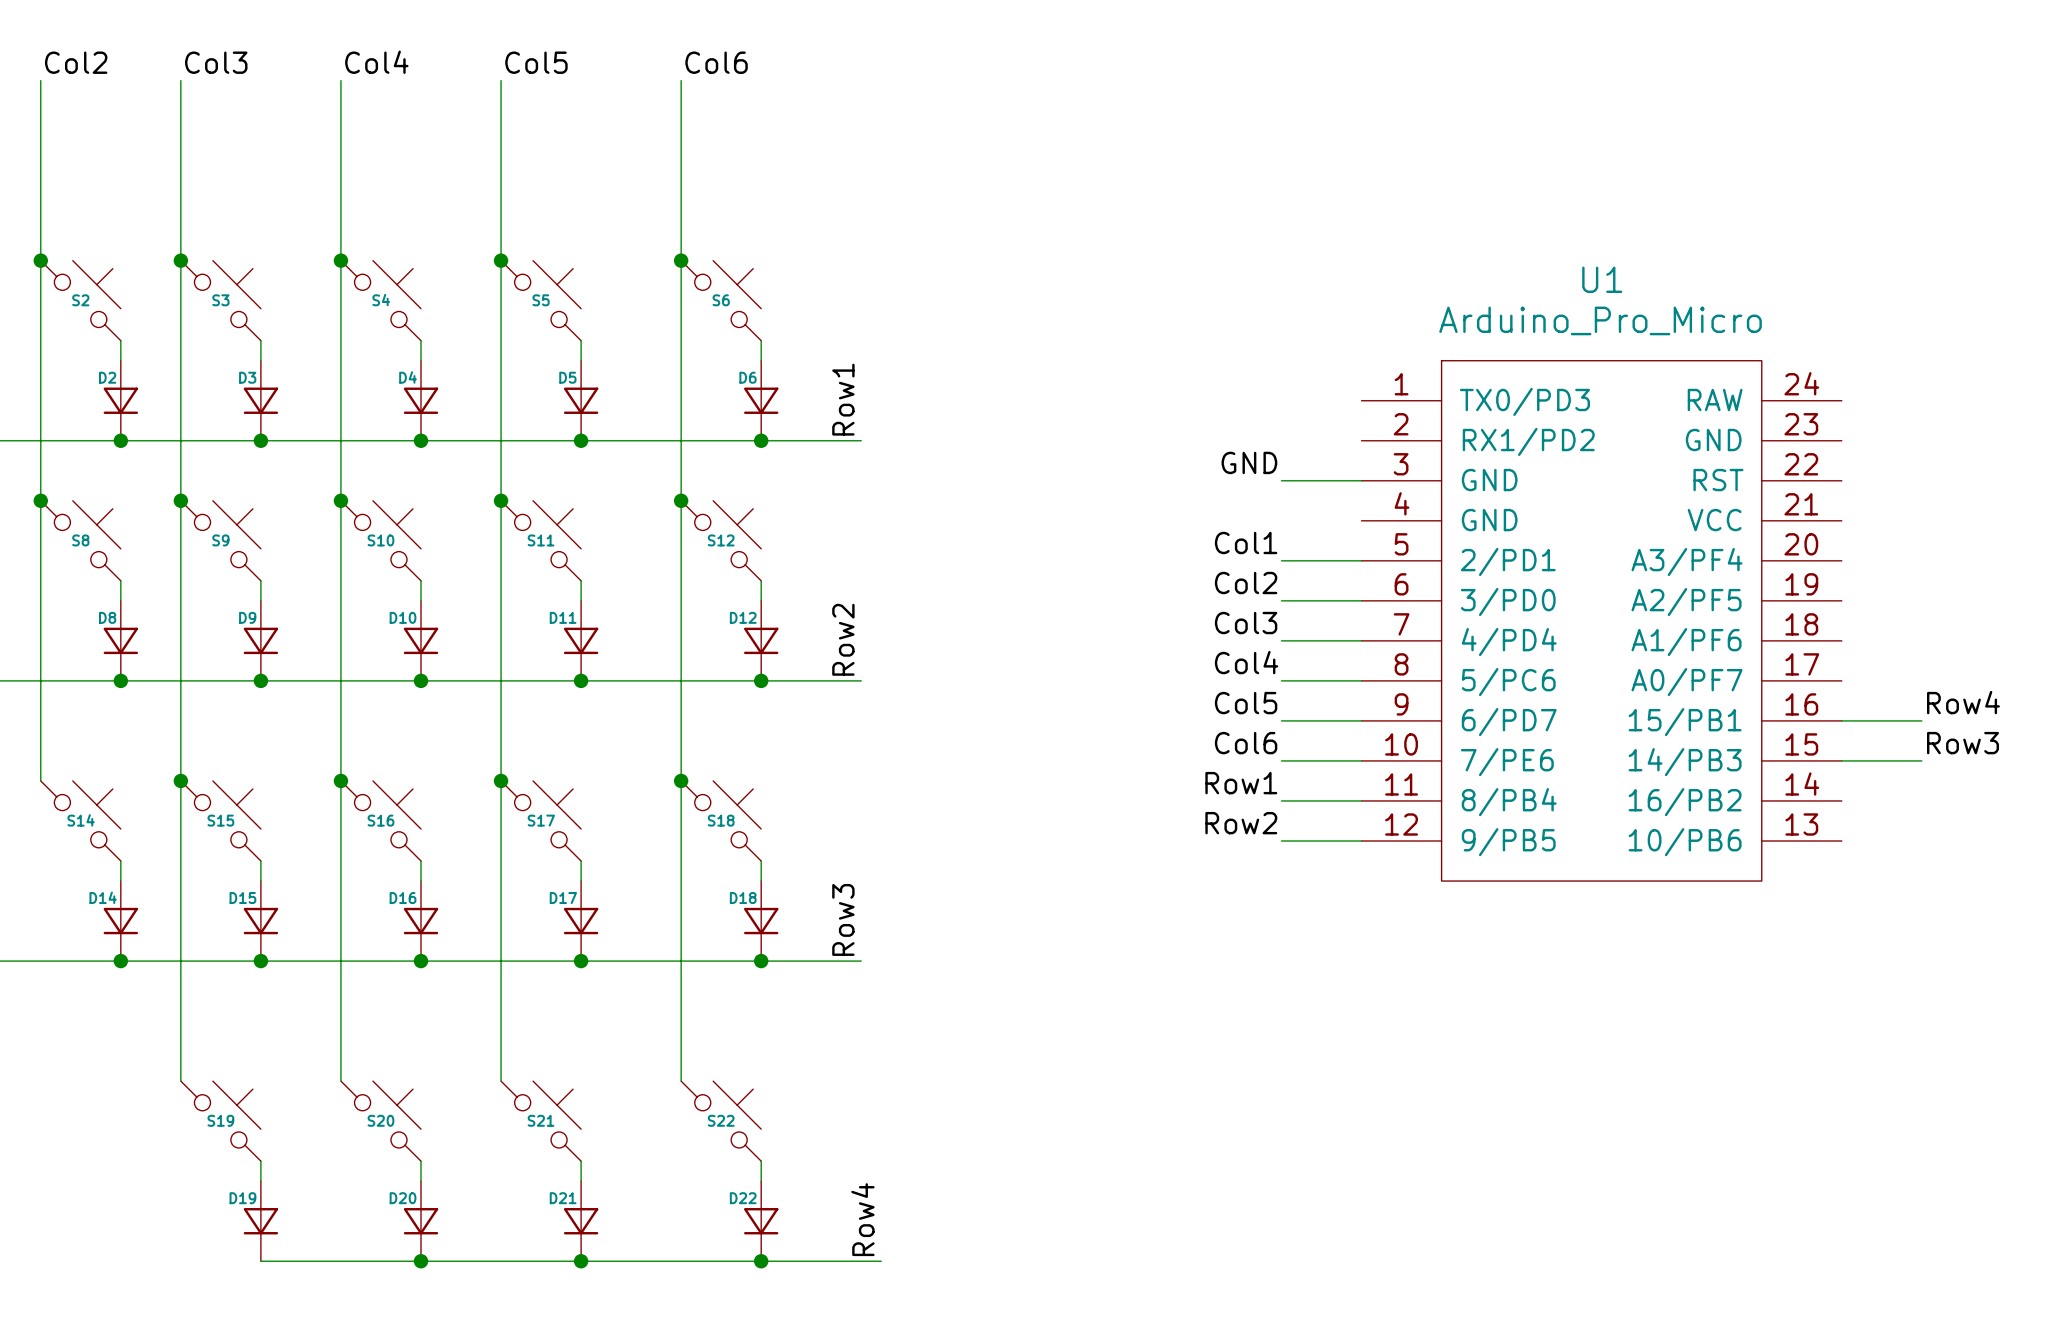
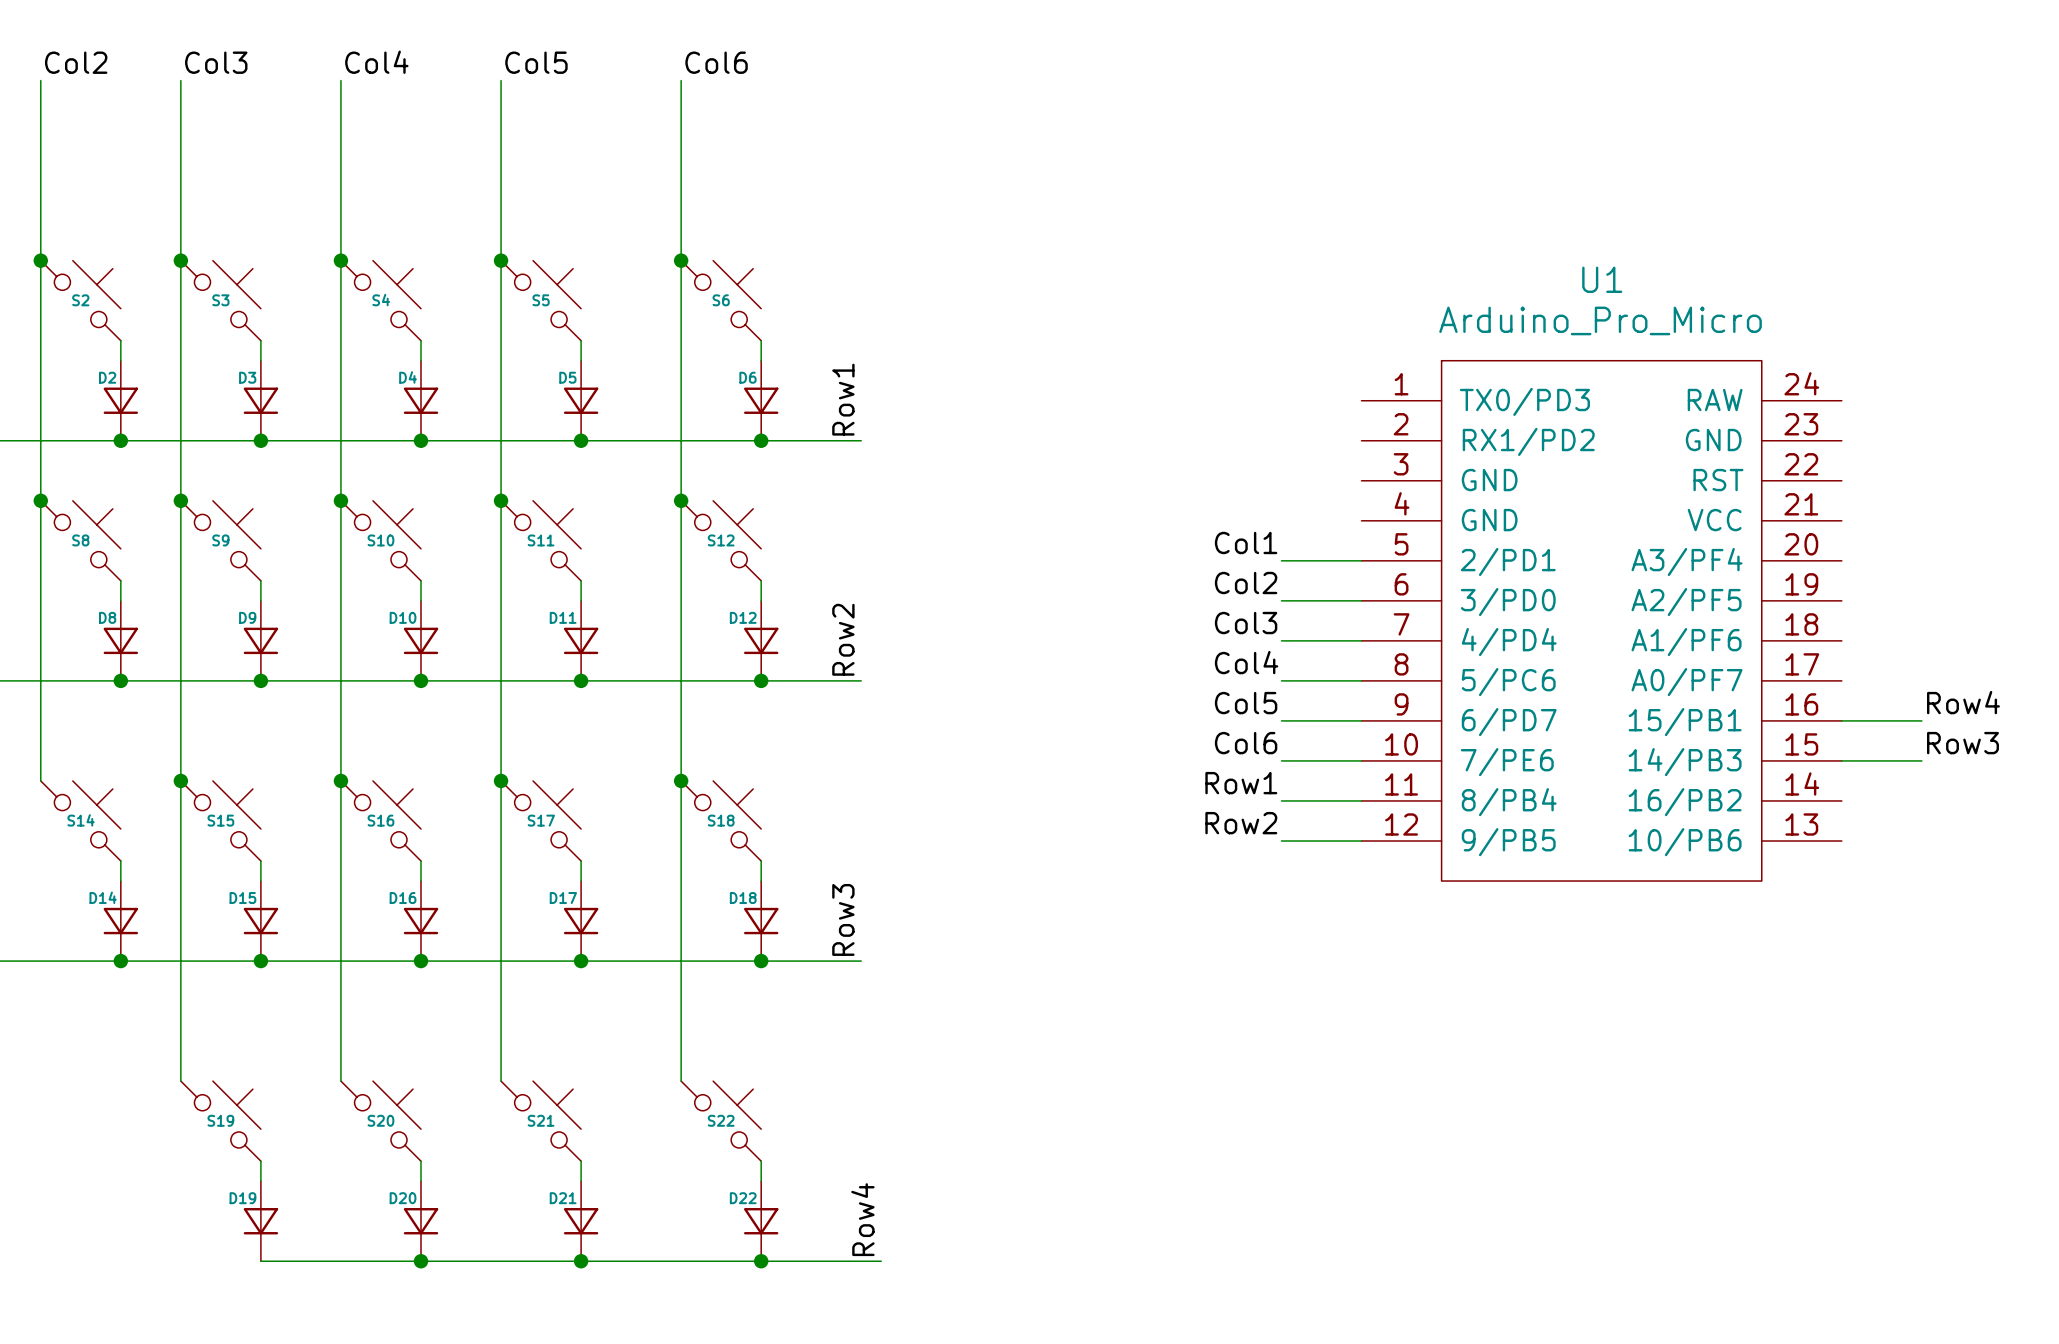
label: GND (1249, 462) -> none
wire: (1281, 480) (1361, 480) -> none

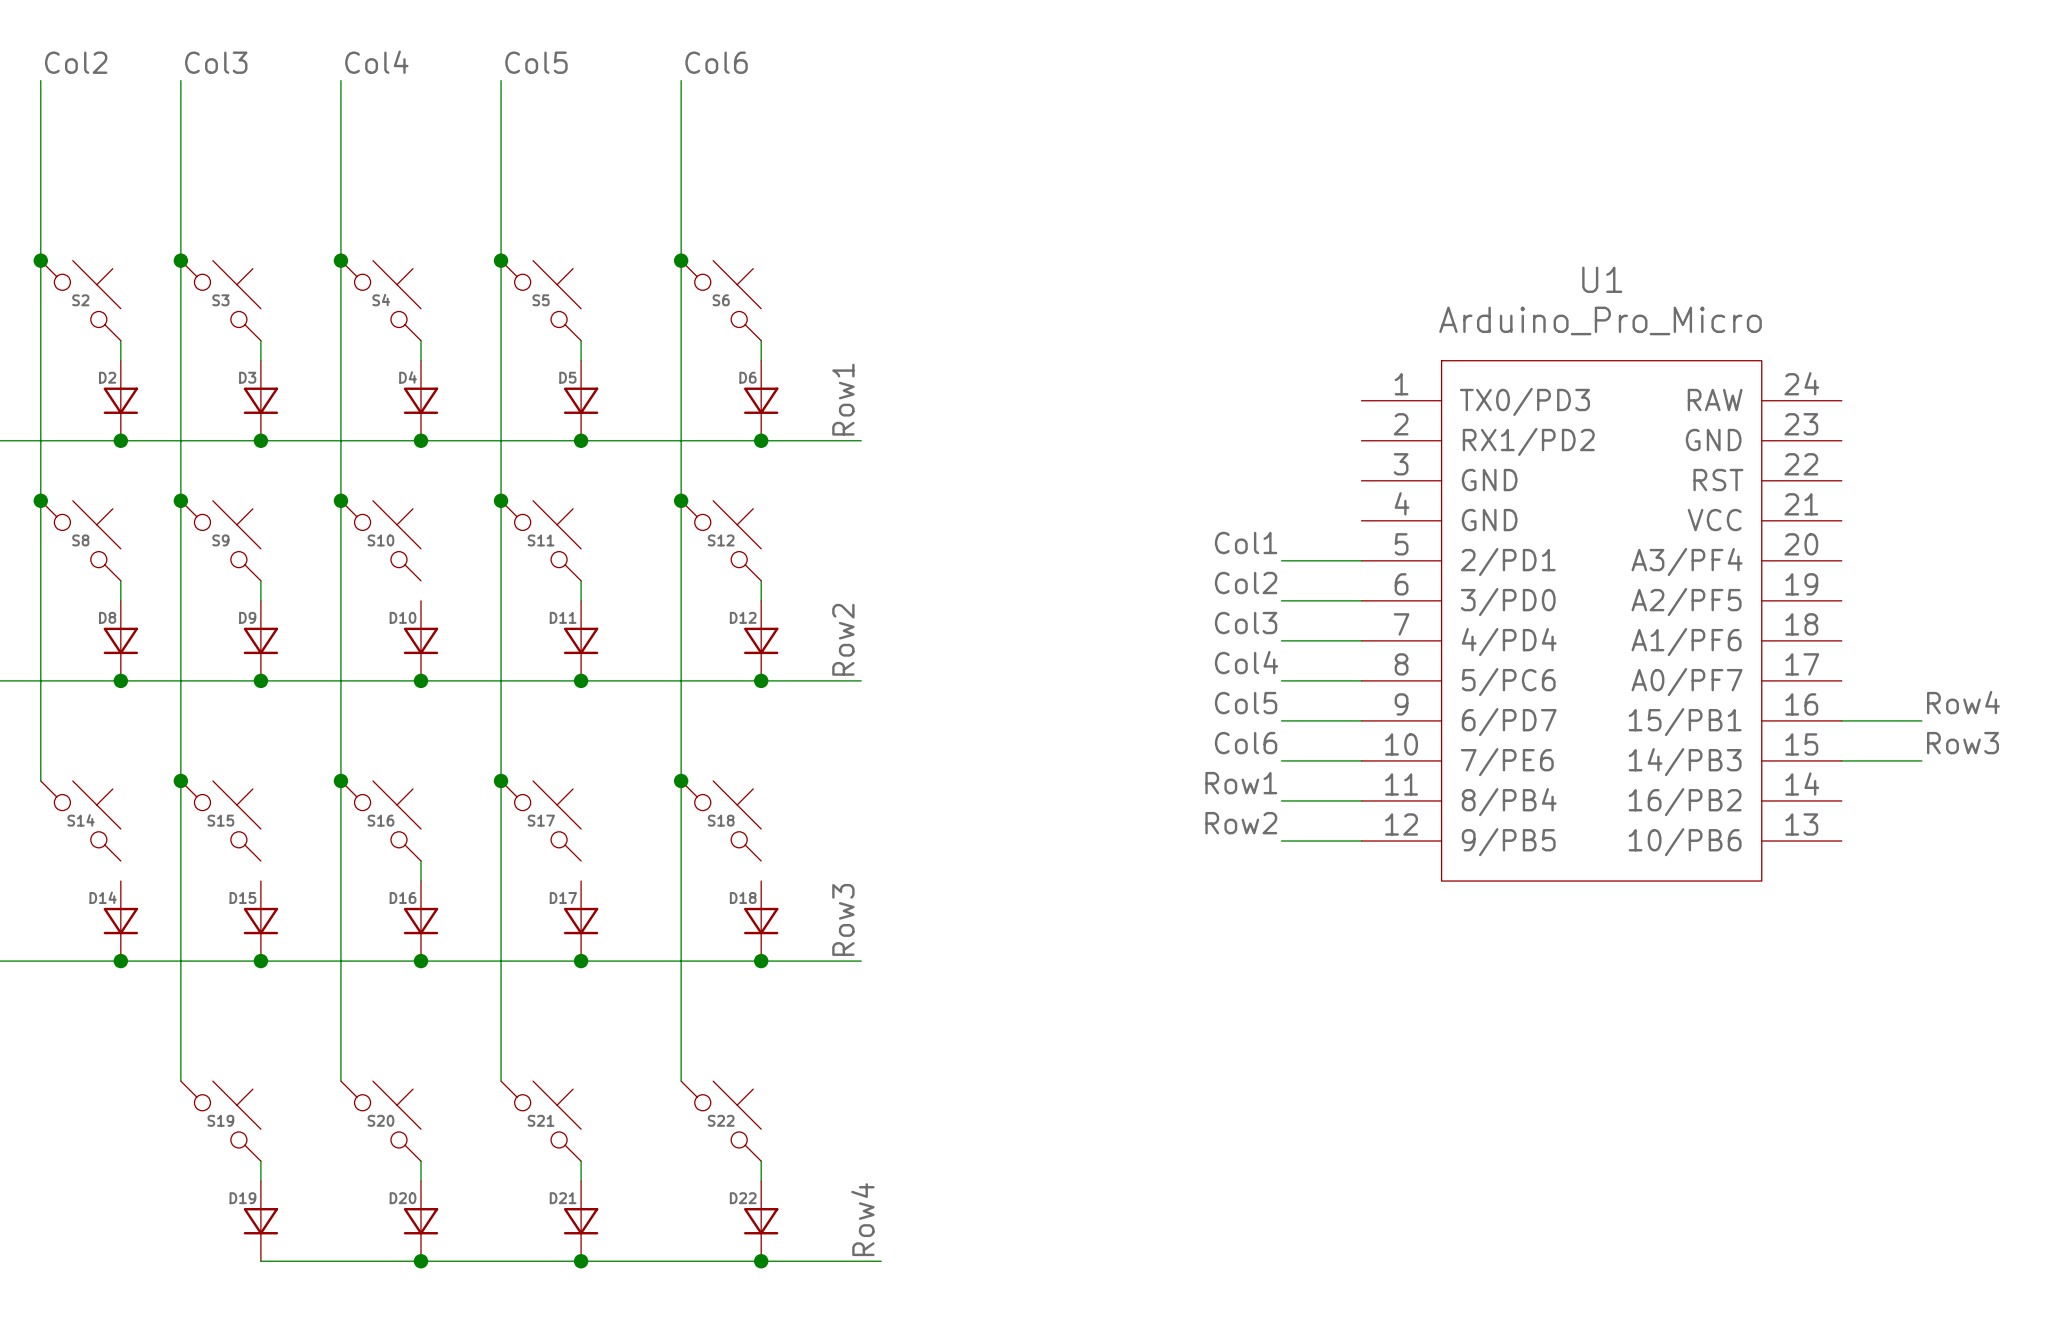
wire: (420, 580) (420, 600) -> none
wire: (120, 861) (120, 881) -> none
wire: (260, 861) (260, 881) -> none
wire: (581, 861) (581, 881) -> none
wire: (761, 861) (761, 881) -> none

